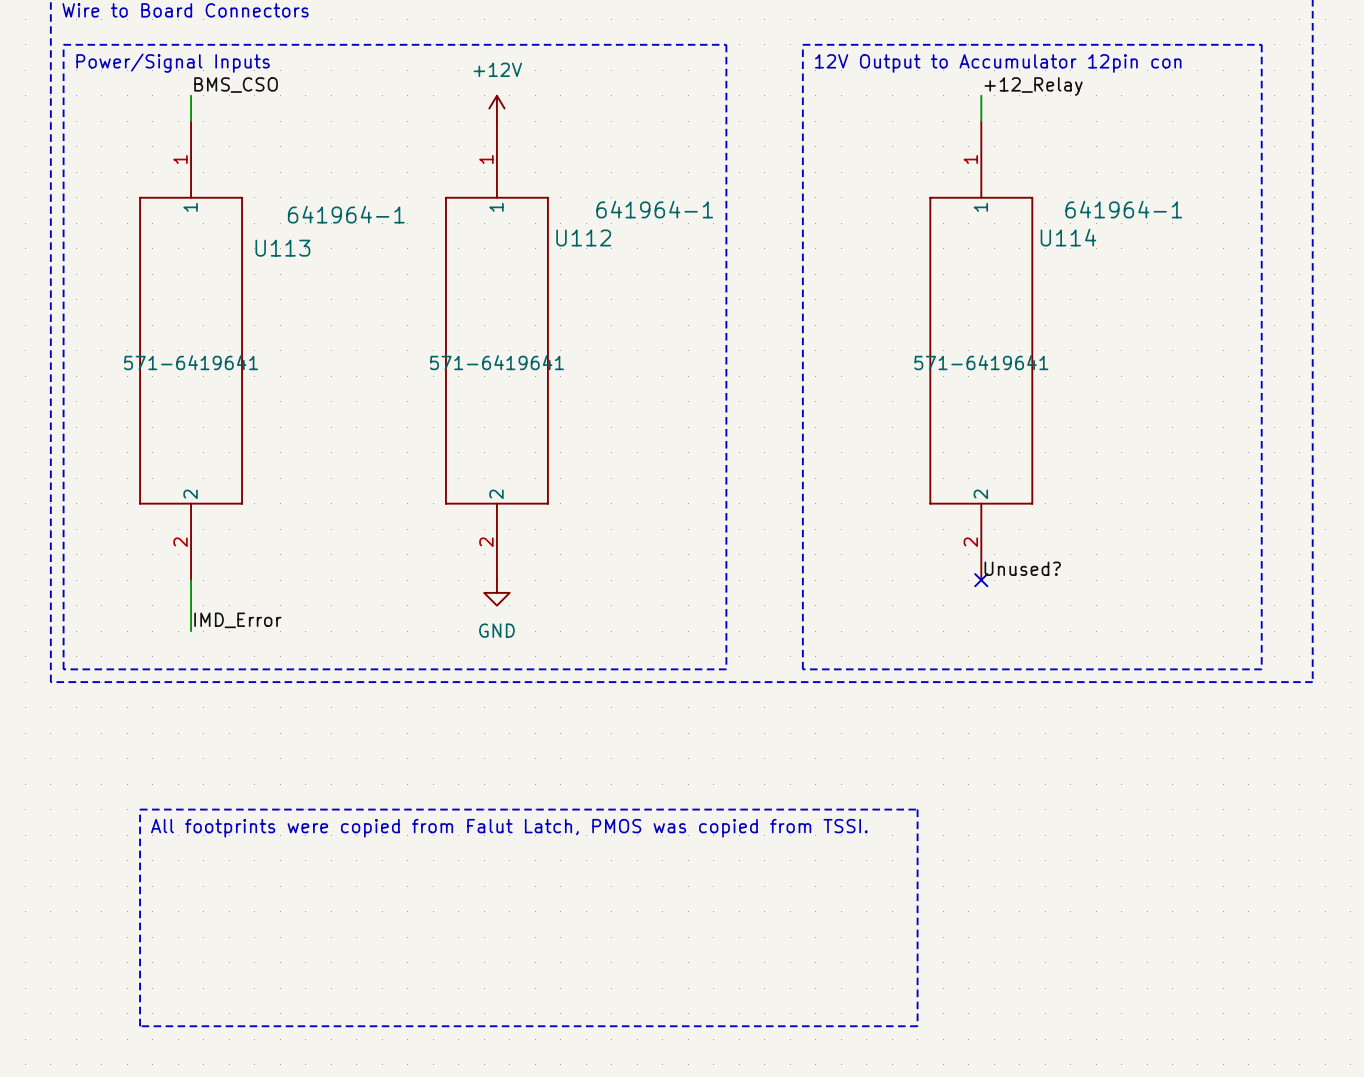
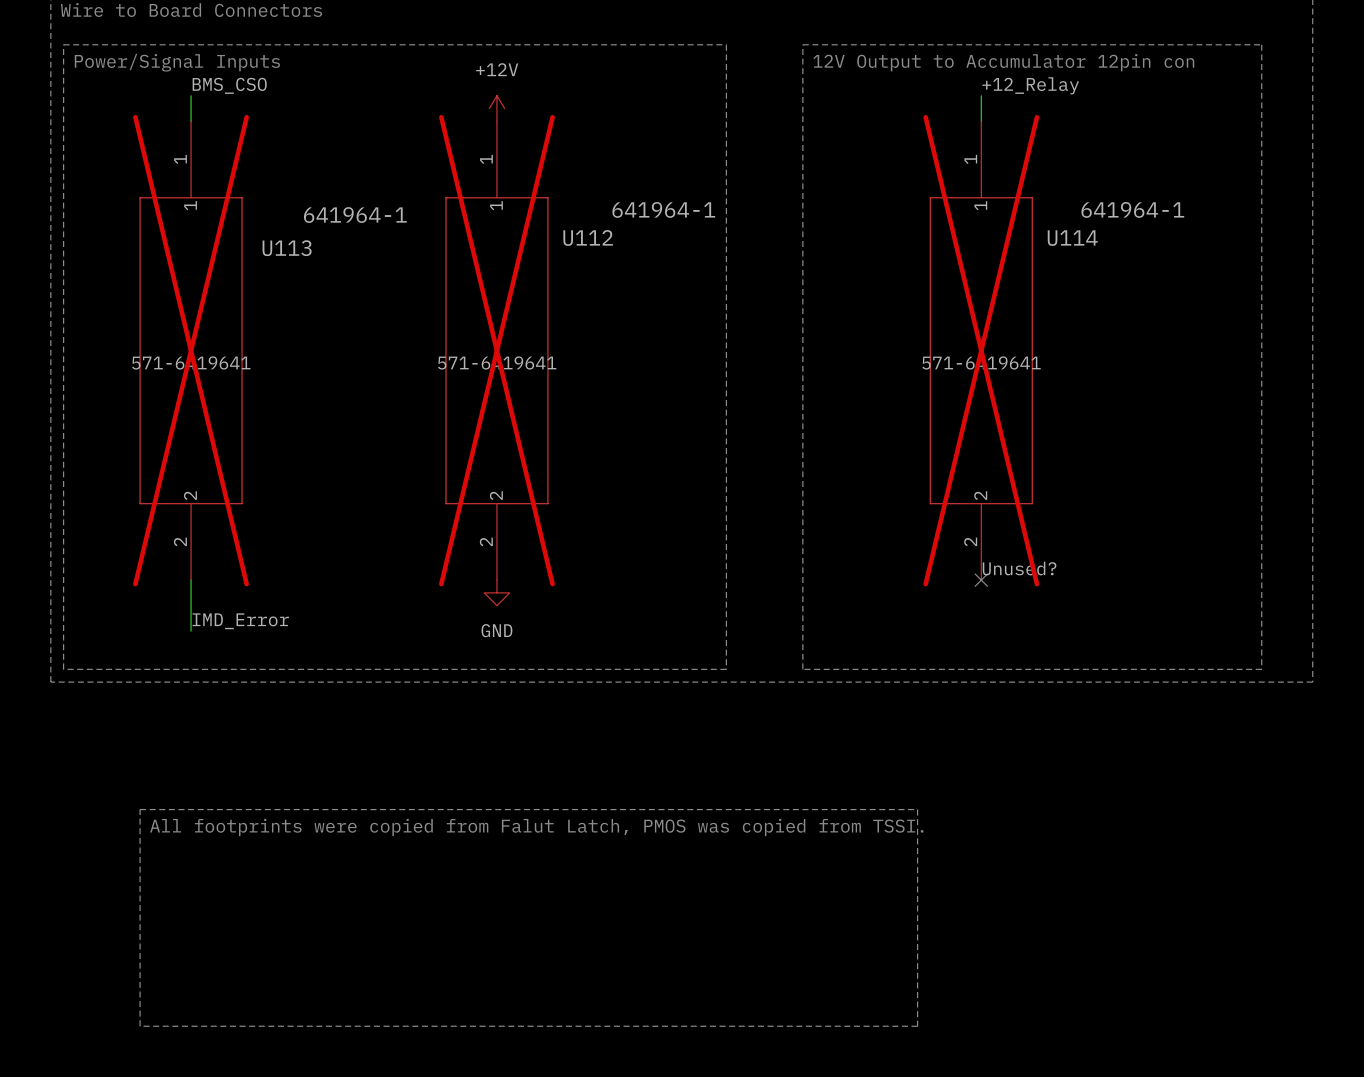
U113 do-not-place cross: none -> (191, 350)
U112 do-not-place cross: none -> (496, 350)
U114 do-not-place cross: none -> (981, 350)

